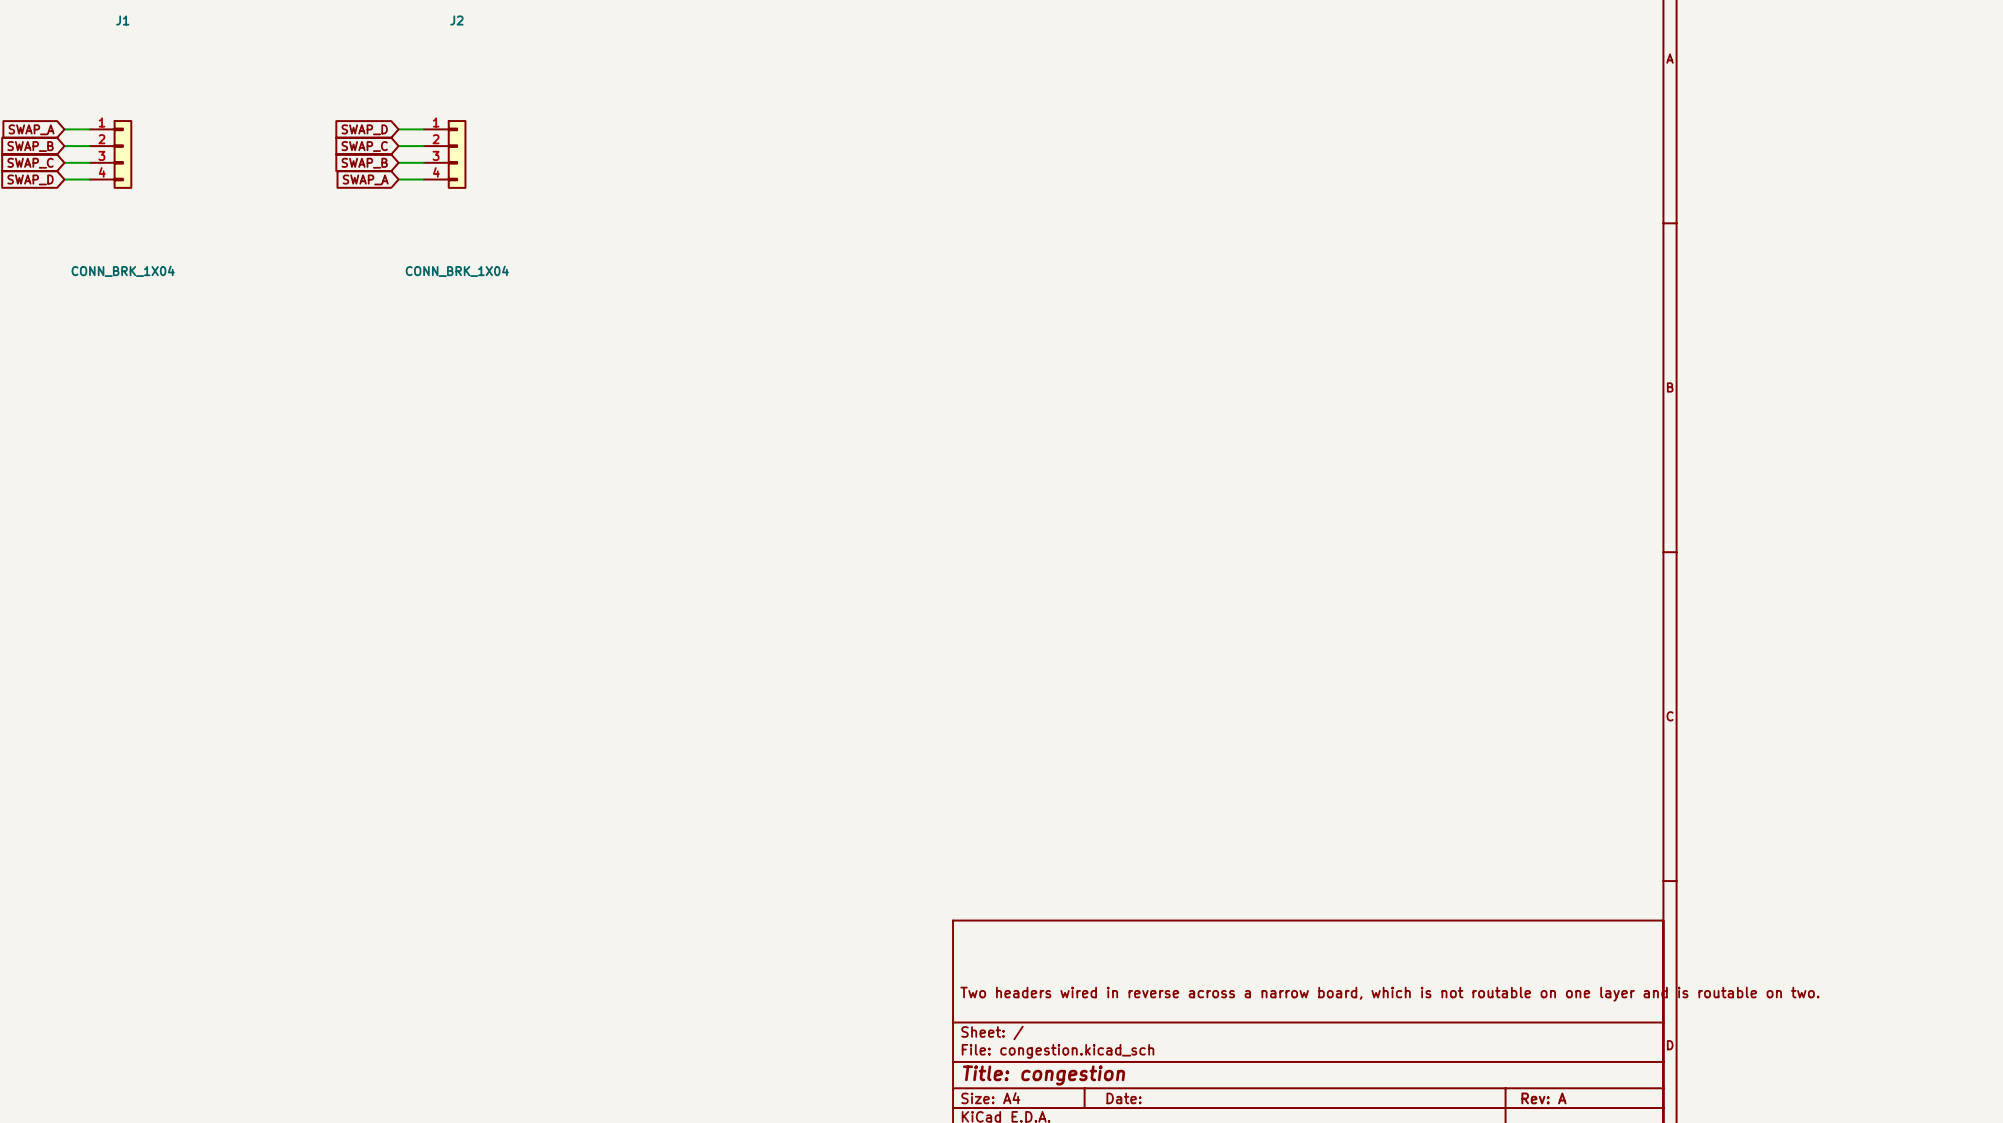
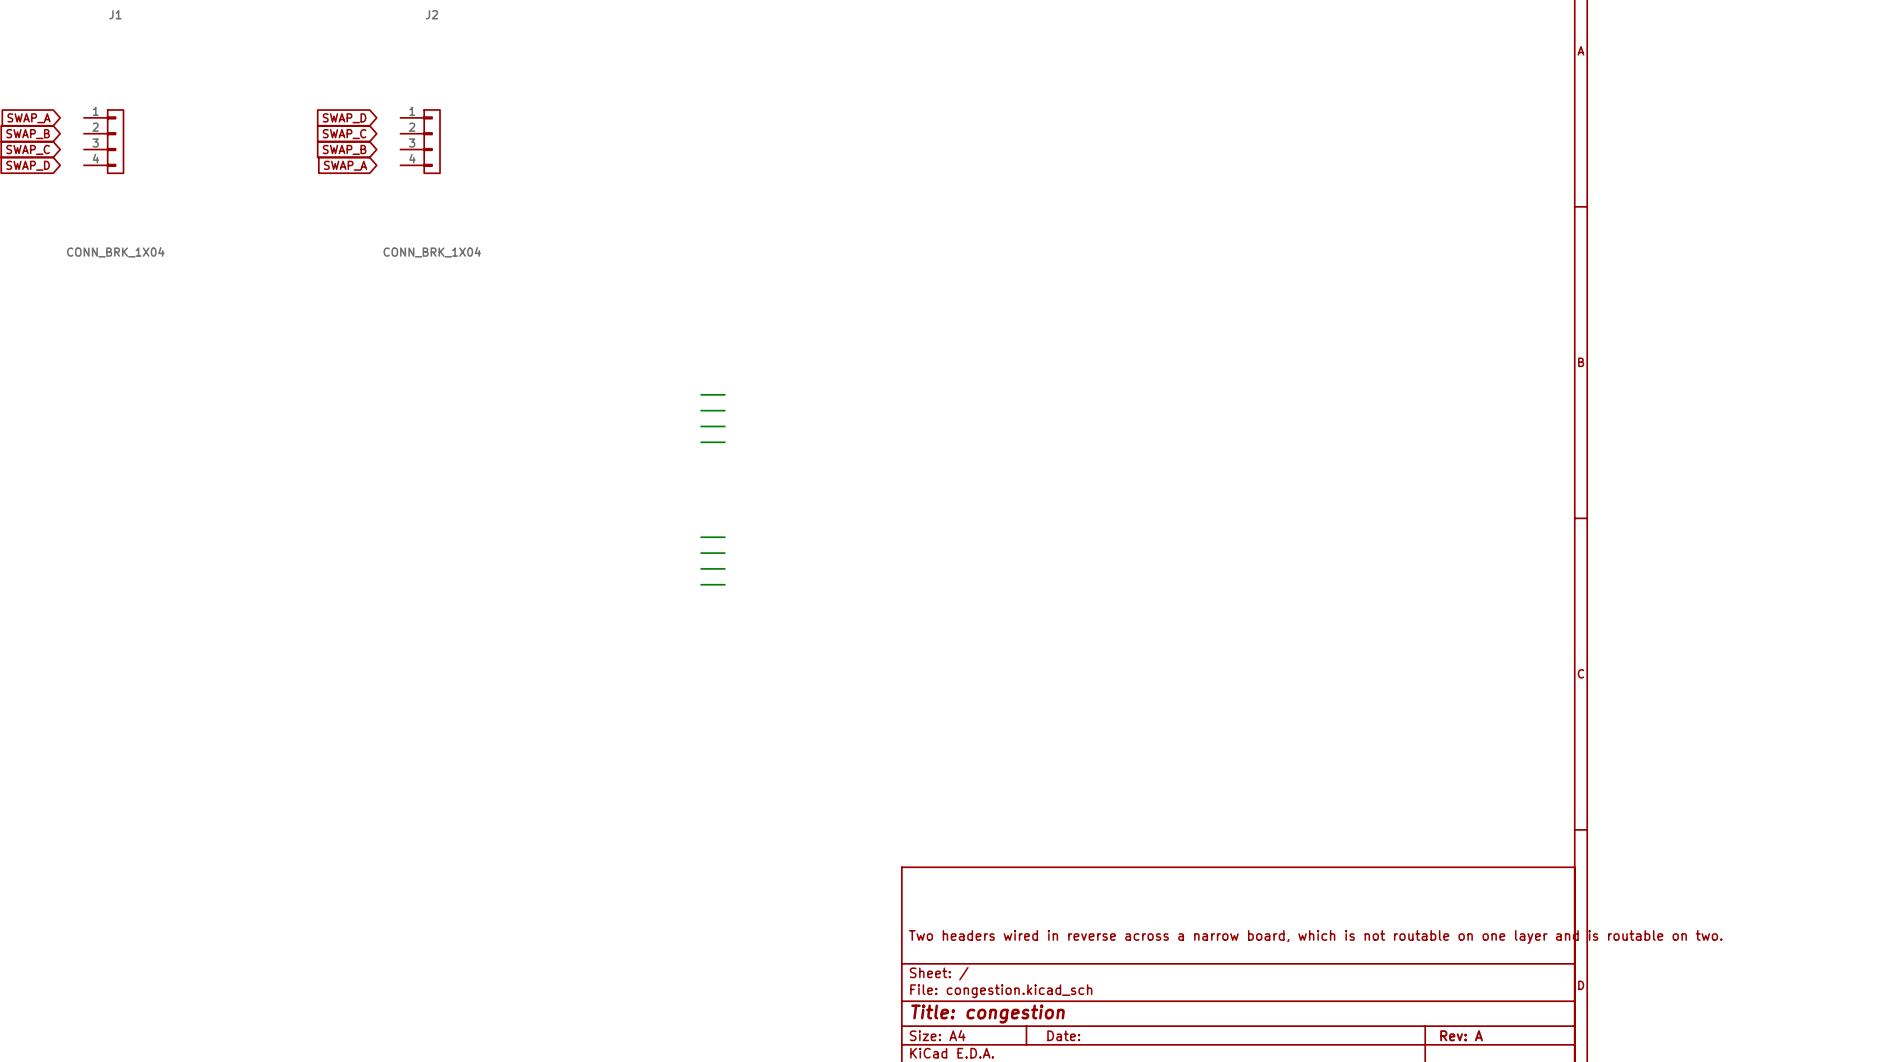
wire: (64, 129) (89, 129) -> none
wire: (398, 129) (423, 129) -> none
wire: (64, 146) (89, 146) -> none
wire: (398, 146) (423, 146) -> none
wire: (64, 162) (89, 162) -> none
wire: (398, 162) (423, 162) -> none
wire: (64, 179) (89, 179) -> none
wire: (398, 179) (423, 179) -> none
wire: none -> (701, 394) (724, 394)
wire: none -> (701, 410) (724, 410)
wire: none -> (701, 426) (724, 426)
wire: none -> (701, 442) (724, 442)
wire: none -> (701, 537) (724, 537)
wire: none -> (701, 553) (724, 553)
wire: none -> (701, 568) (724, 568)
wire: none -> (701, 584) (724, 584)

